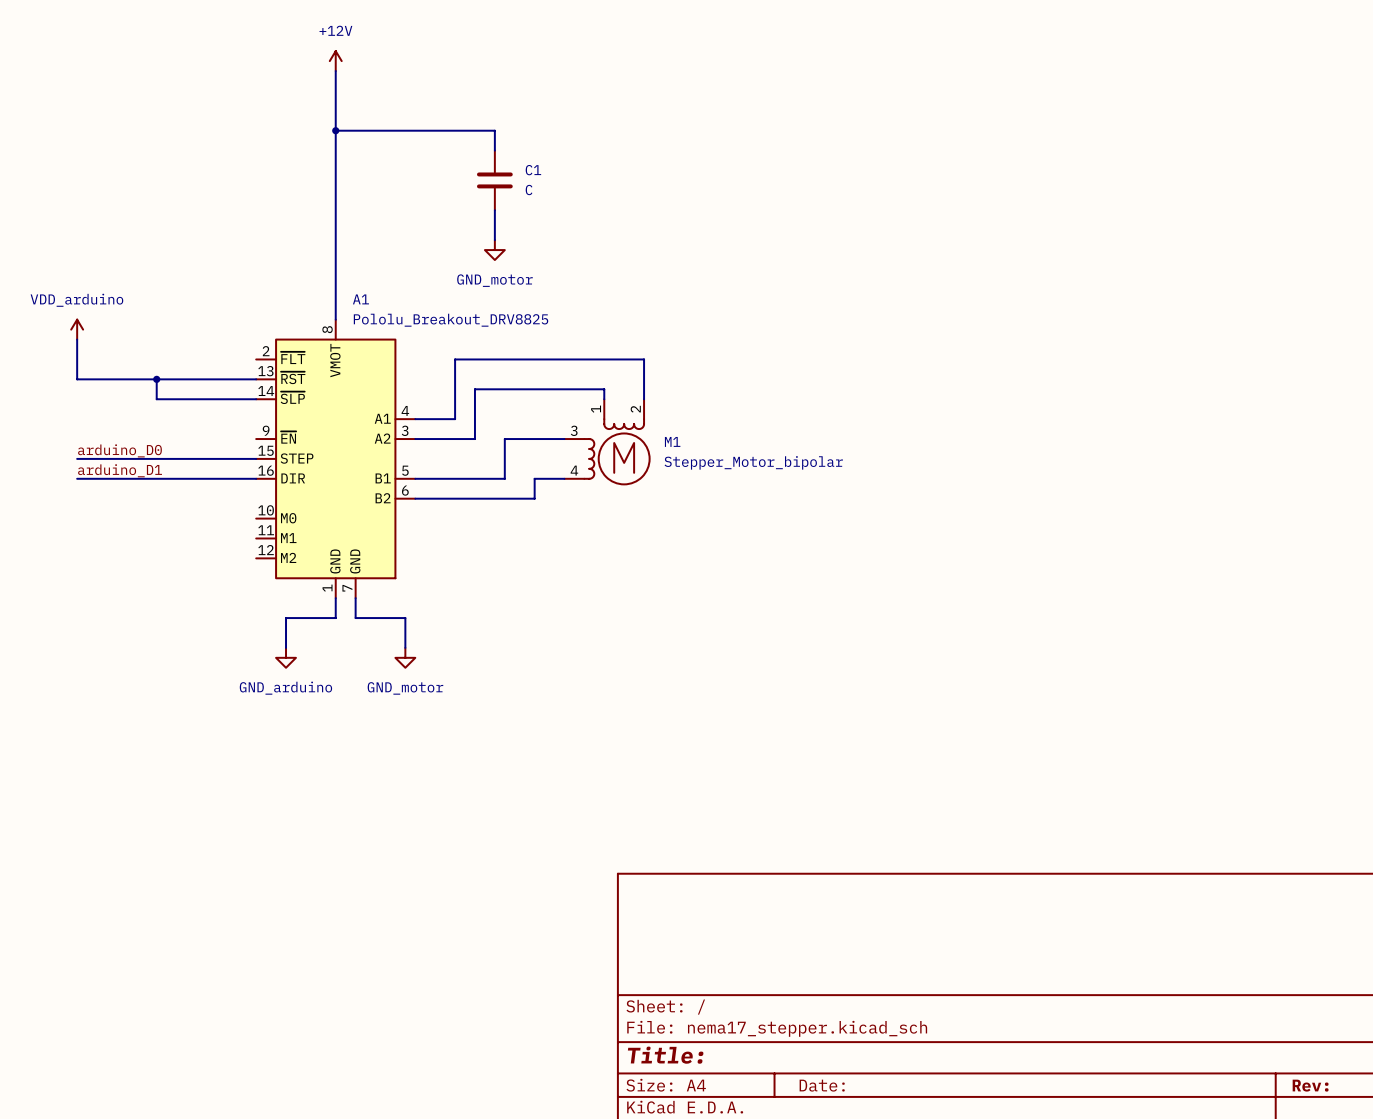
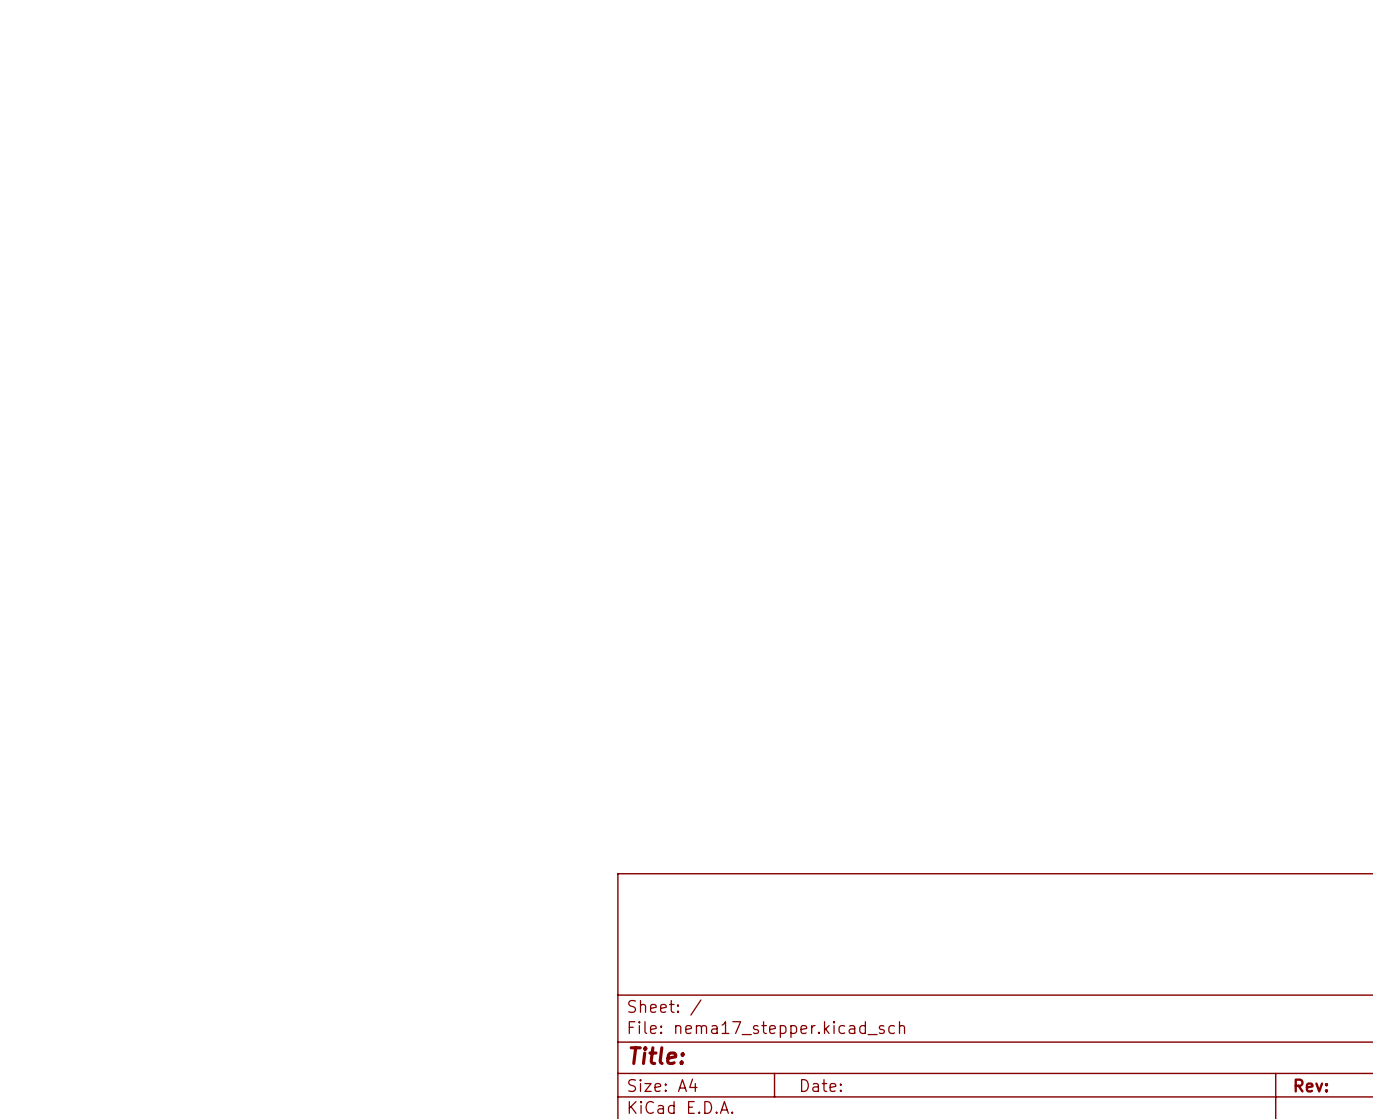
power symbol: +12V (335, 61) -> none
wire: (335, 71) (335, 319) -> none
wire: (335, 130) (494, 130) (494, 150) -> none
junction: (335, 130) -> none
C1: C (494, 180) -> none
wire: (494, 210) (494, 240) -> none
power symbol: GND_motor (494, 250) -> none
power symbol: VDD_arduino (77, 329) -> none
wire: (77, 339) (77, 379) (256, 379) -> none
wire: (156, 379) (156, 399) (256, 399) -> none
junction: (156, 379) -> none
wire: (604, 399) (604, 389) (474, 389) (474, 439) (415, 439) -> none
wire: (644, 399) (644, 359) (455, 359) (455, 419) (415, 419) -> none
wire: (564, 439) (504, 439) (504, 478) (415, 478) -> none
M1: Stepper_Motor_bipolar (607, 442) -> none
label: arduino_D0 (119, 450) -> none
wire: (77, 458) (256, 458) -> none
A1: Pololu_Breakout_DRV8825 (335, 458) -> none
label: arduino_D1 (120, 470) -> none
wire: (77, 478) (256, 478) -> none
wire: (564, 478) (534, 478) (534, 498) (415, 498) -> none
wire: (335, 598) (335, 618) (286, 618) (286, 647) -> none
wire: (355, 598) (355, 618) (405, 618) (405, 647) -> none
power symbol: GND_arduino (286, 657) -> none
power symbol: GND_motor (405, 657) -> none

